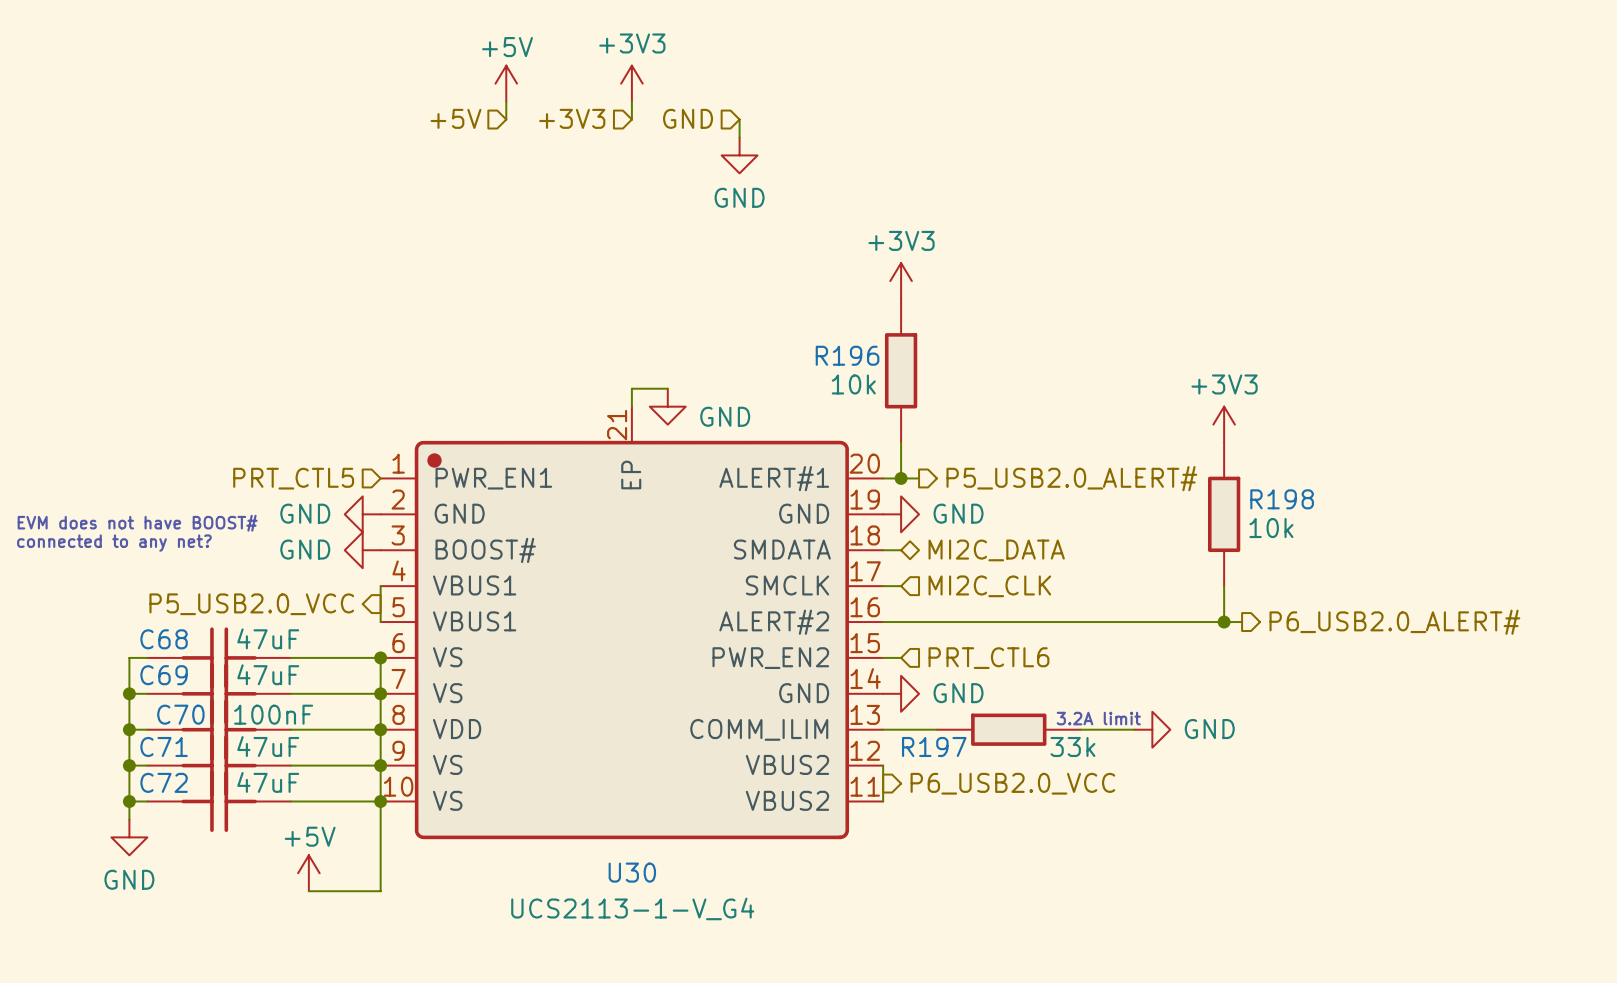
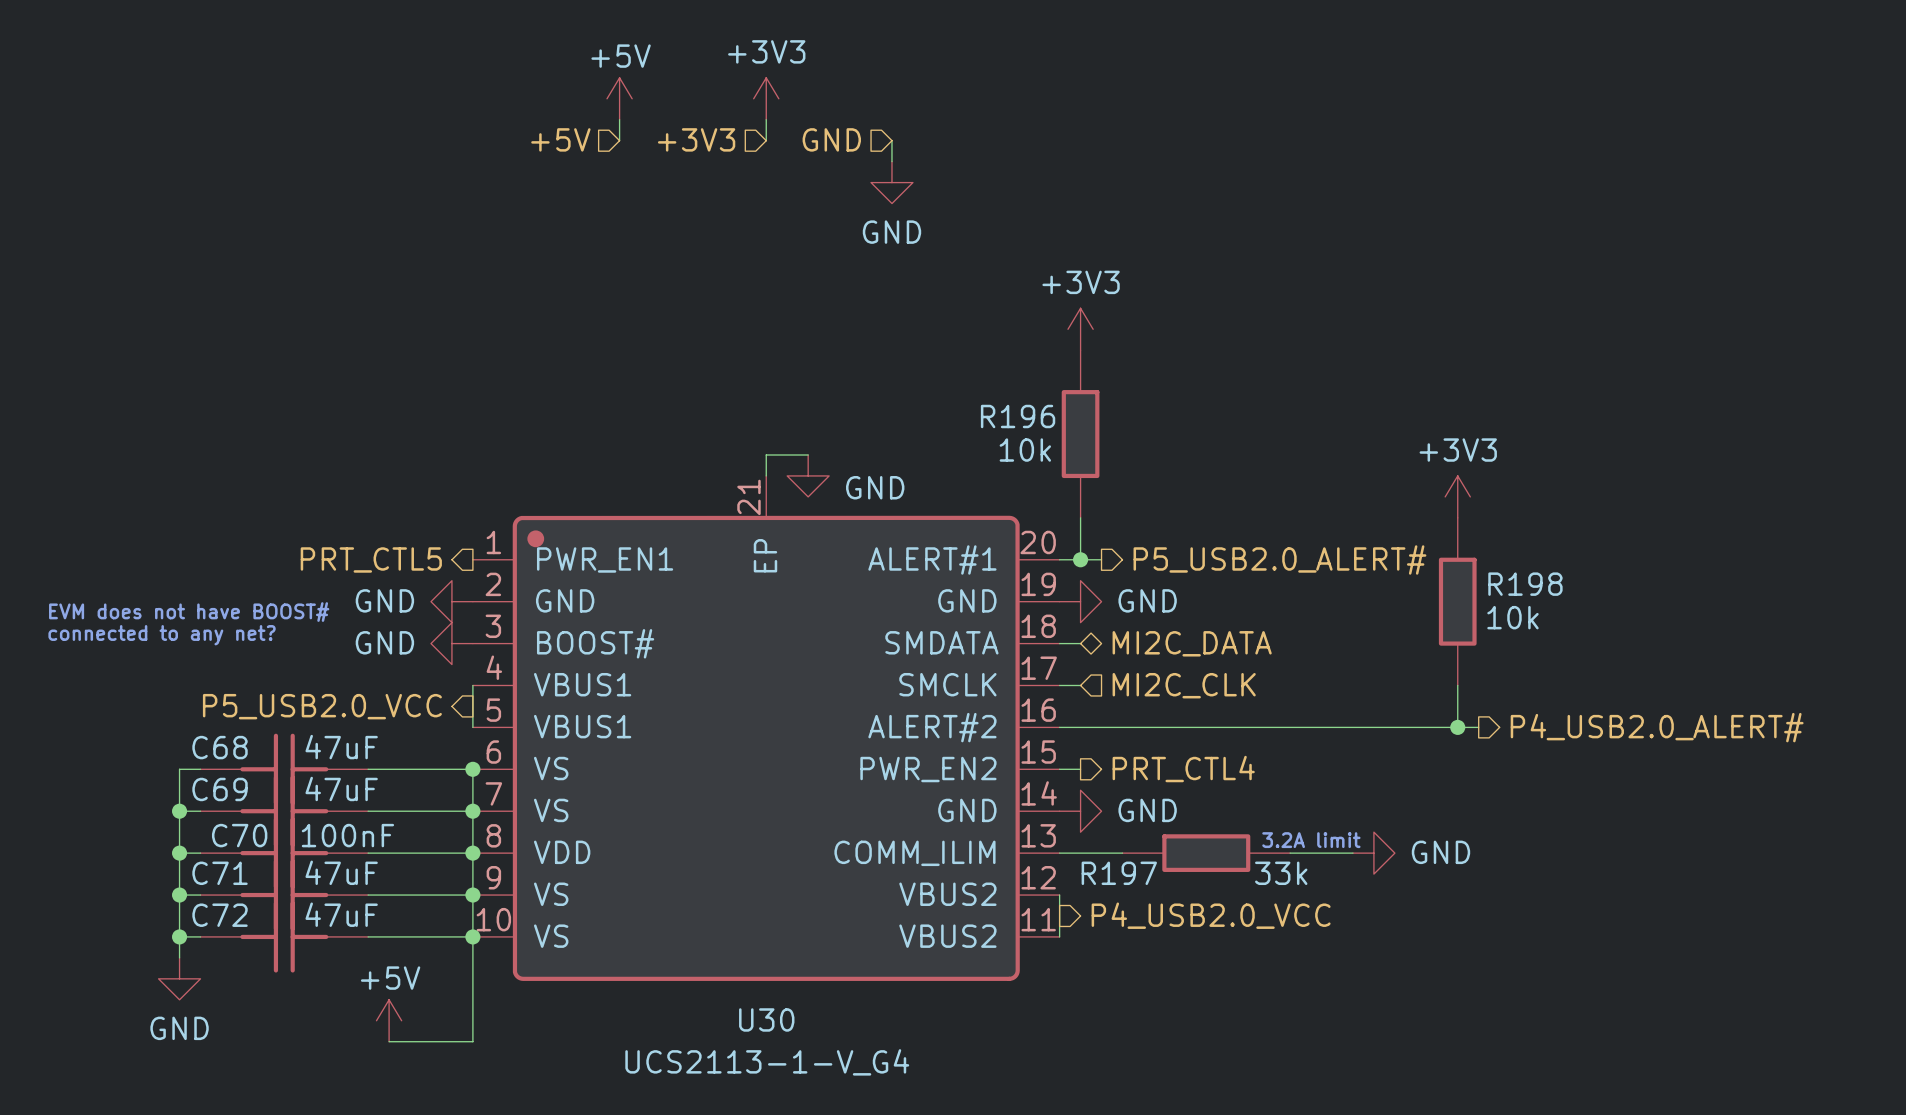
hierarchical label shape: input (293, 478) -> output (371, 559)
hierarchical label: P6_USB2.0_ALERT# (1394, 622) -> P4_USB2.0_ALERT# (1657, 727)
hierarchical label shape: input (988, 658) -> output (1183, 769)
hierarchical label: PRT_CTL6 (988, 658) -> PRT_CTL4 (1183, 769)
hierarchical label: P6_USB2.0_VCC (1012, 783) -> P4_USB2.0_VCC (1211, 915)

